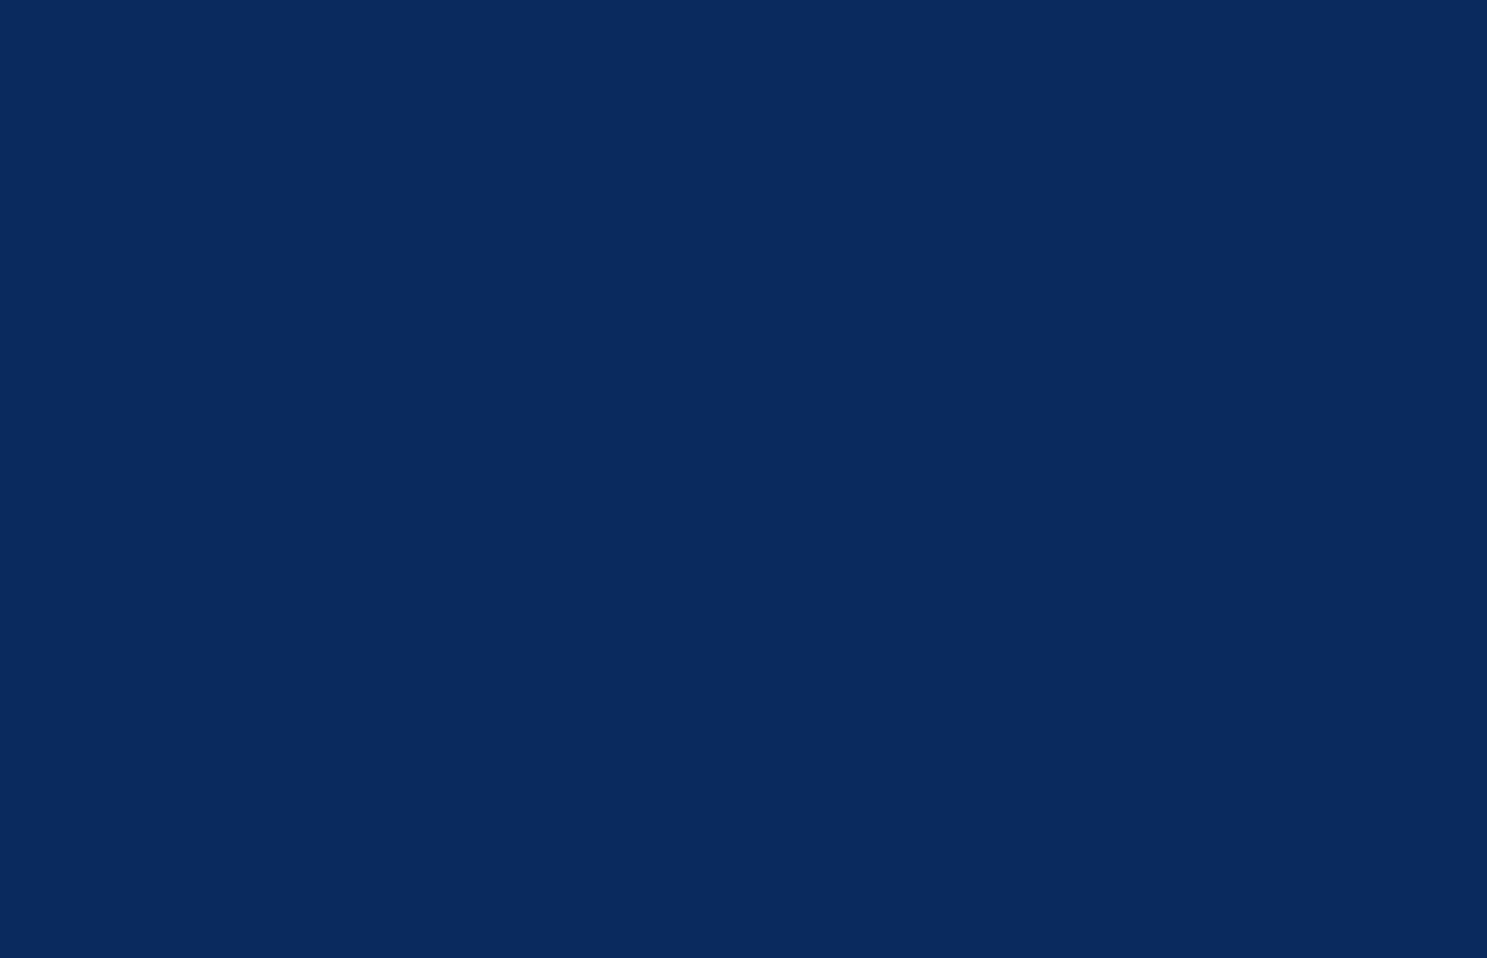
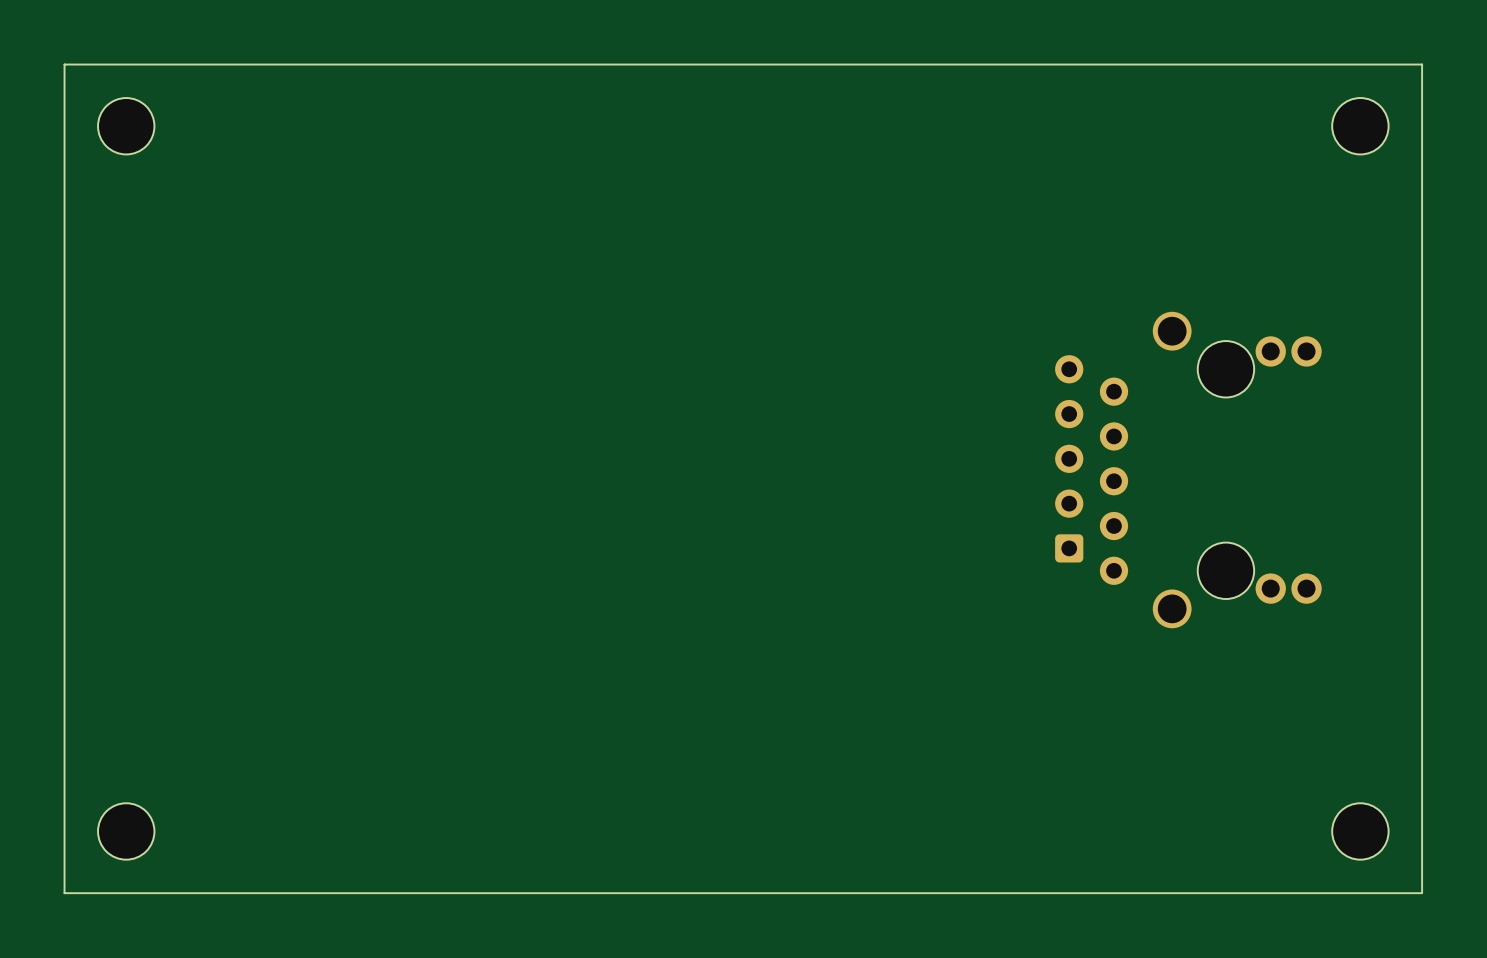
board edge: none -> (1422, 64) (64, 64) (64, 893) (1422, 893) (1422, 64)
part: none -> (126, 126)
part: none -> (1360, 126)
part: none -> (1188, 470)
part: none -> (126, 831)
part: none -> (1360, 831)

